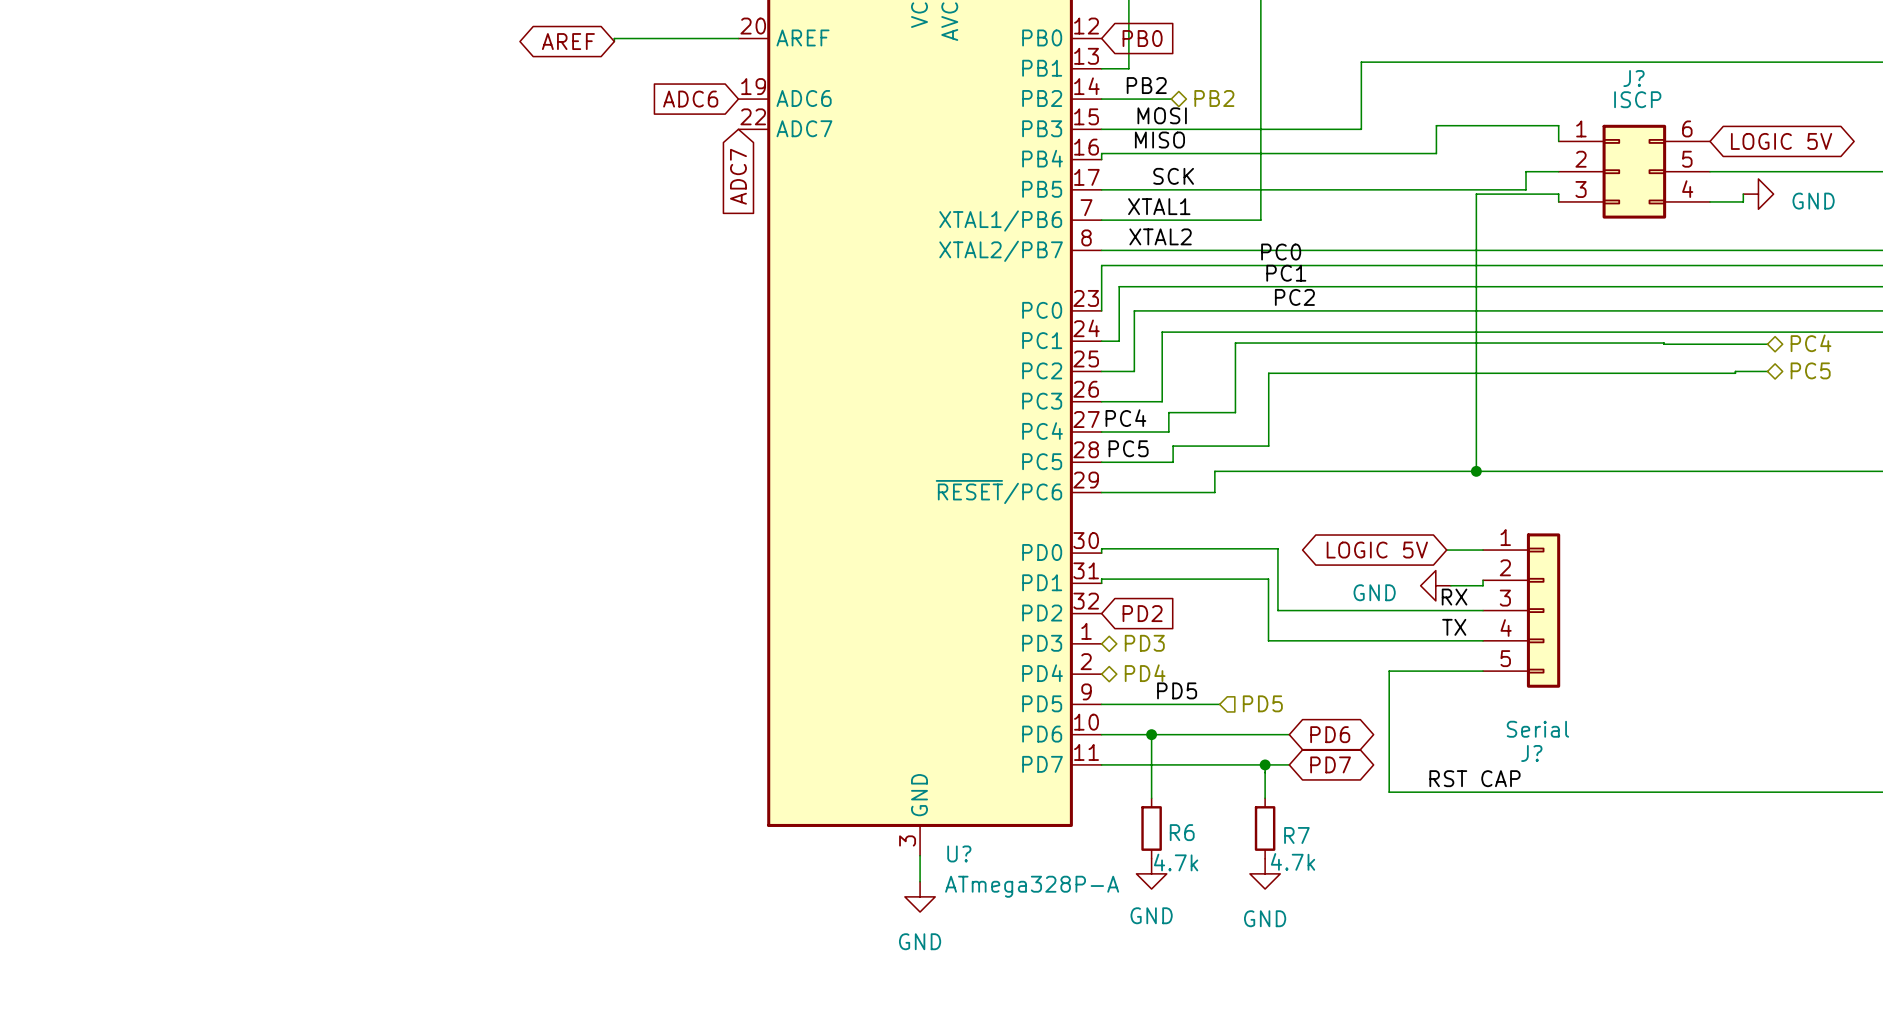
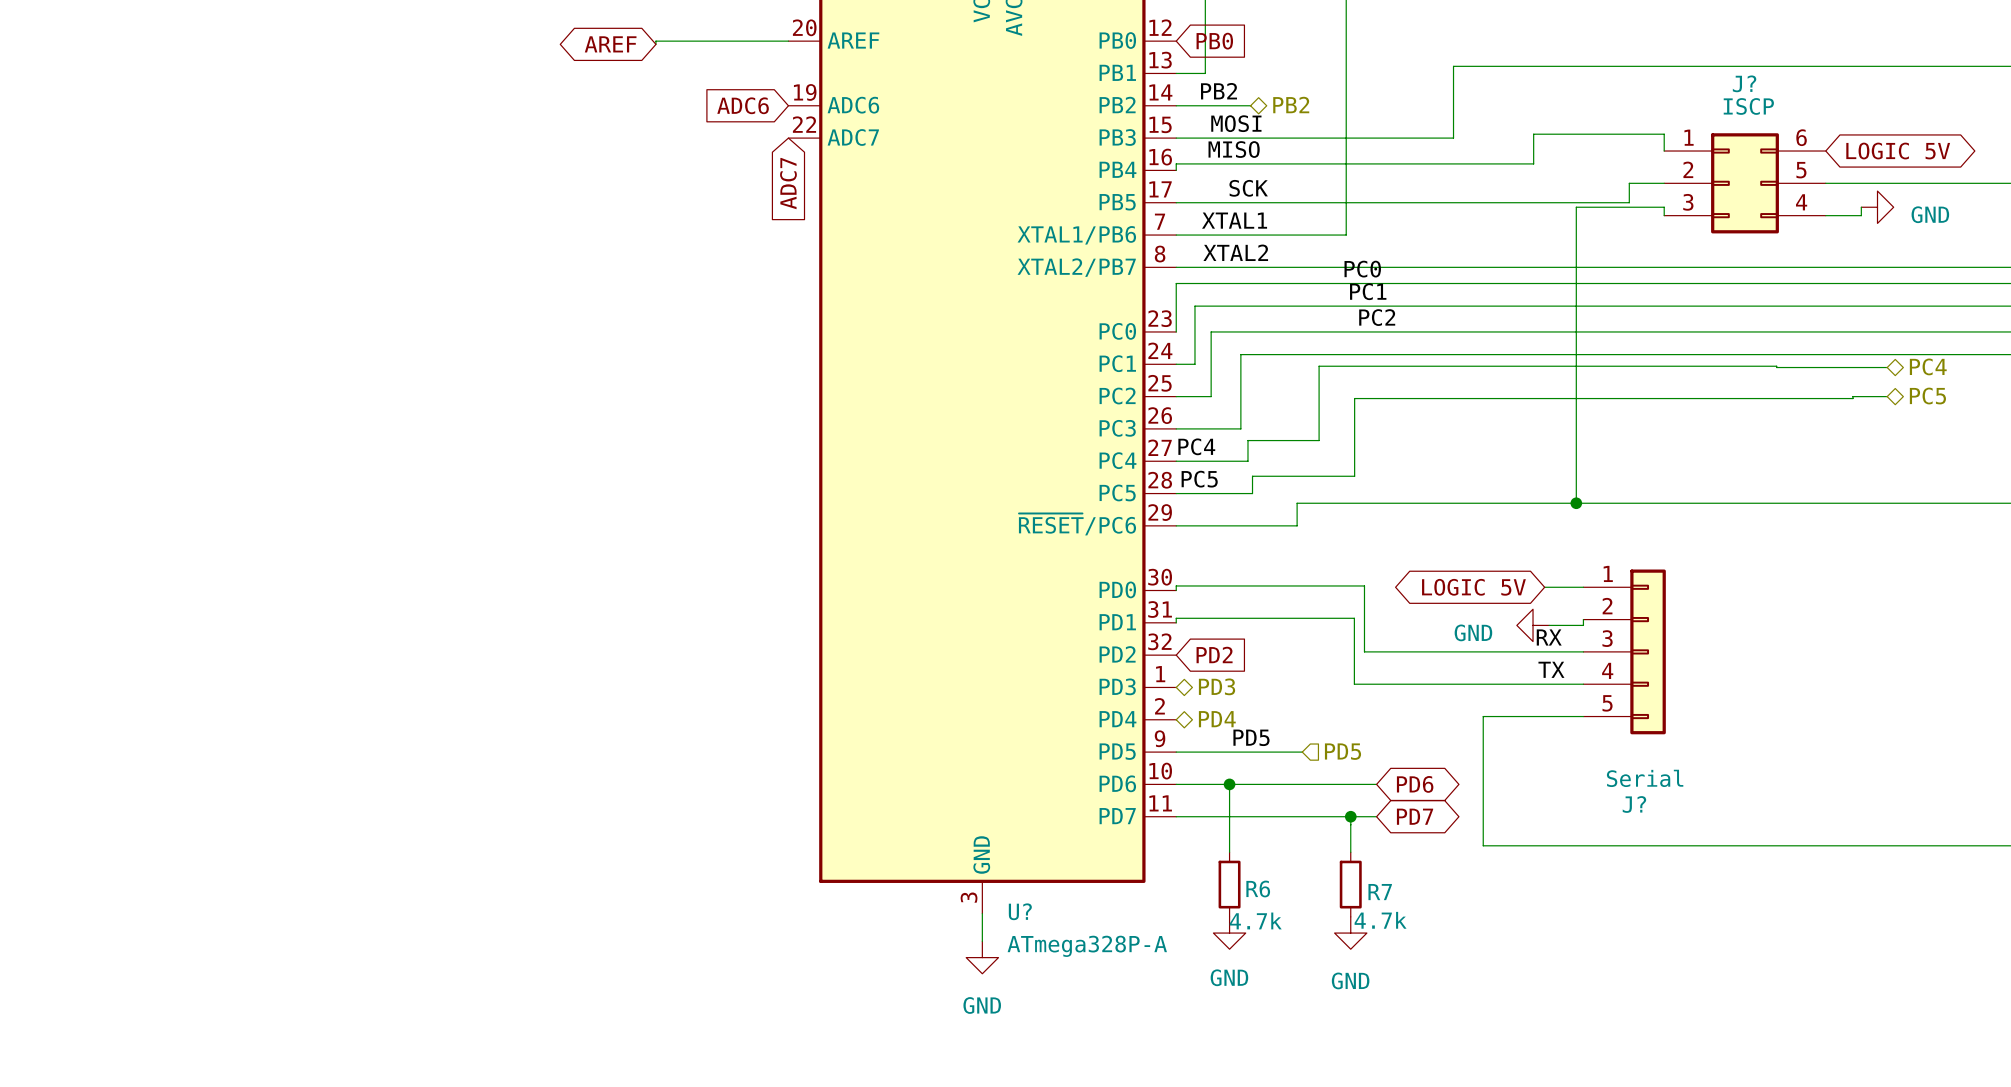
label: RST CAP (1474, 778) -> none

